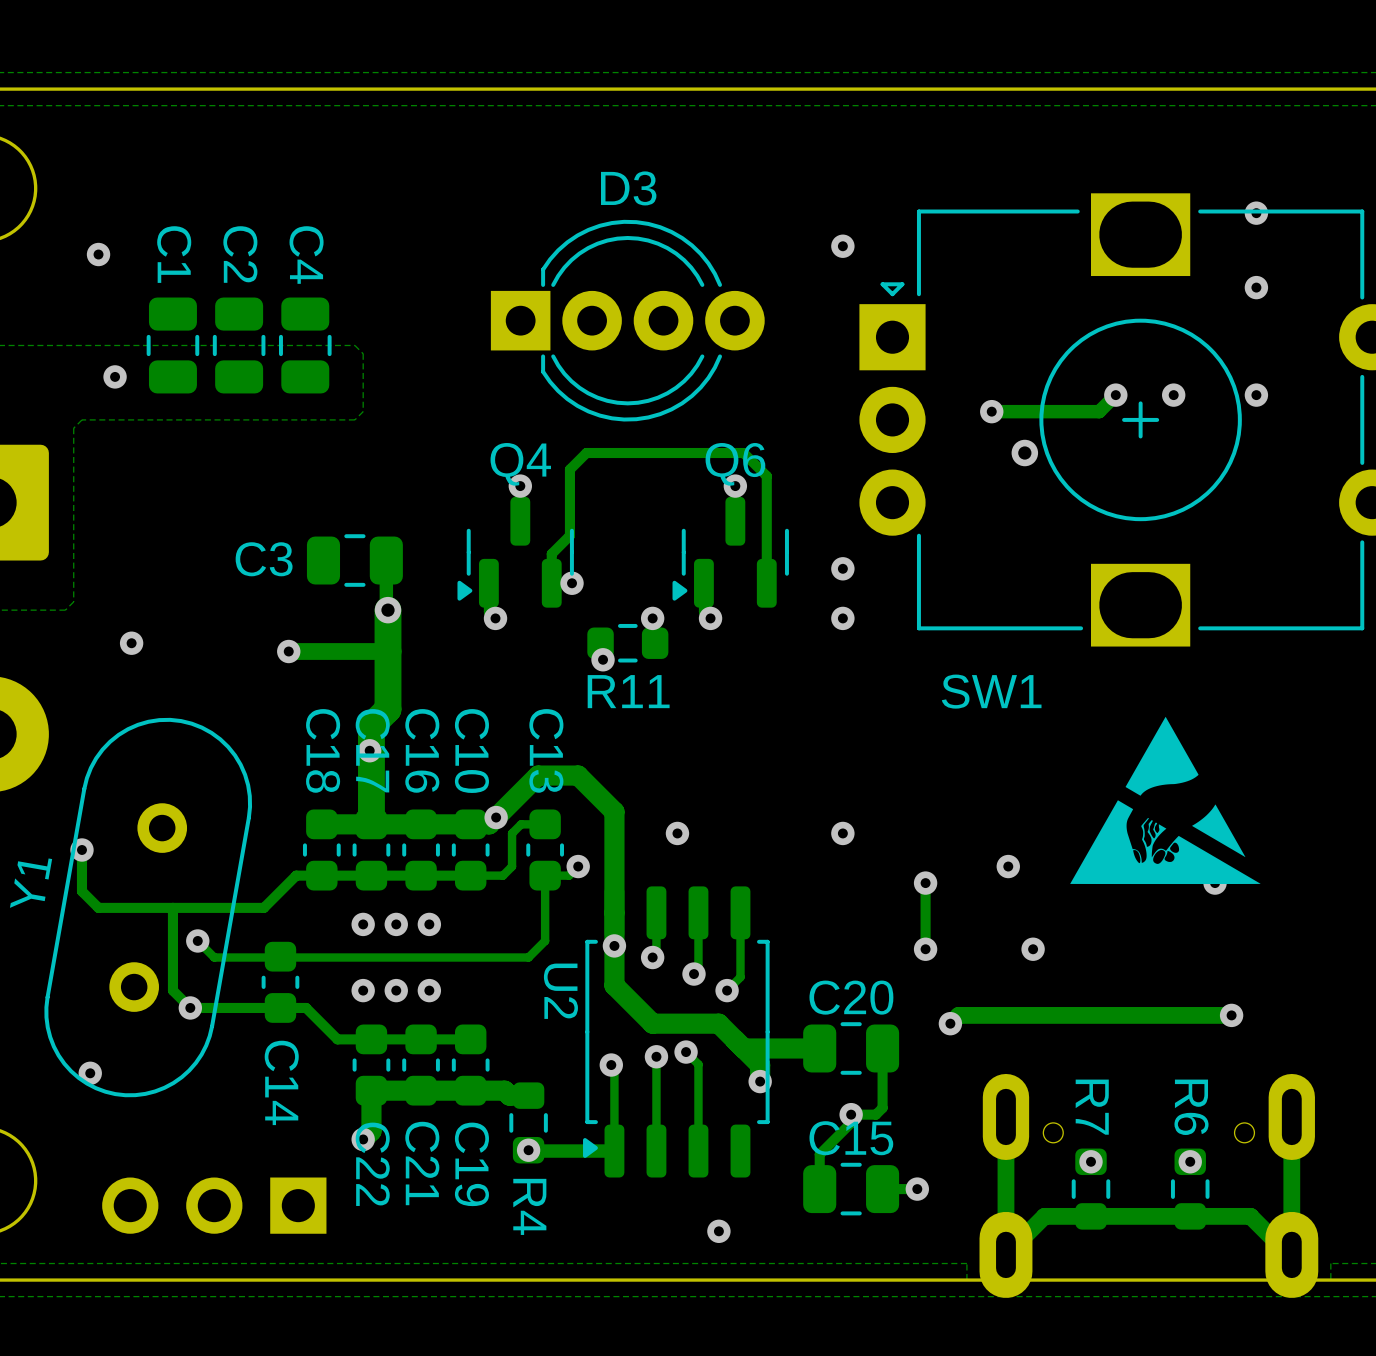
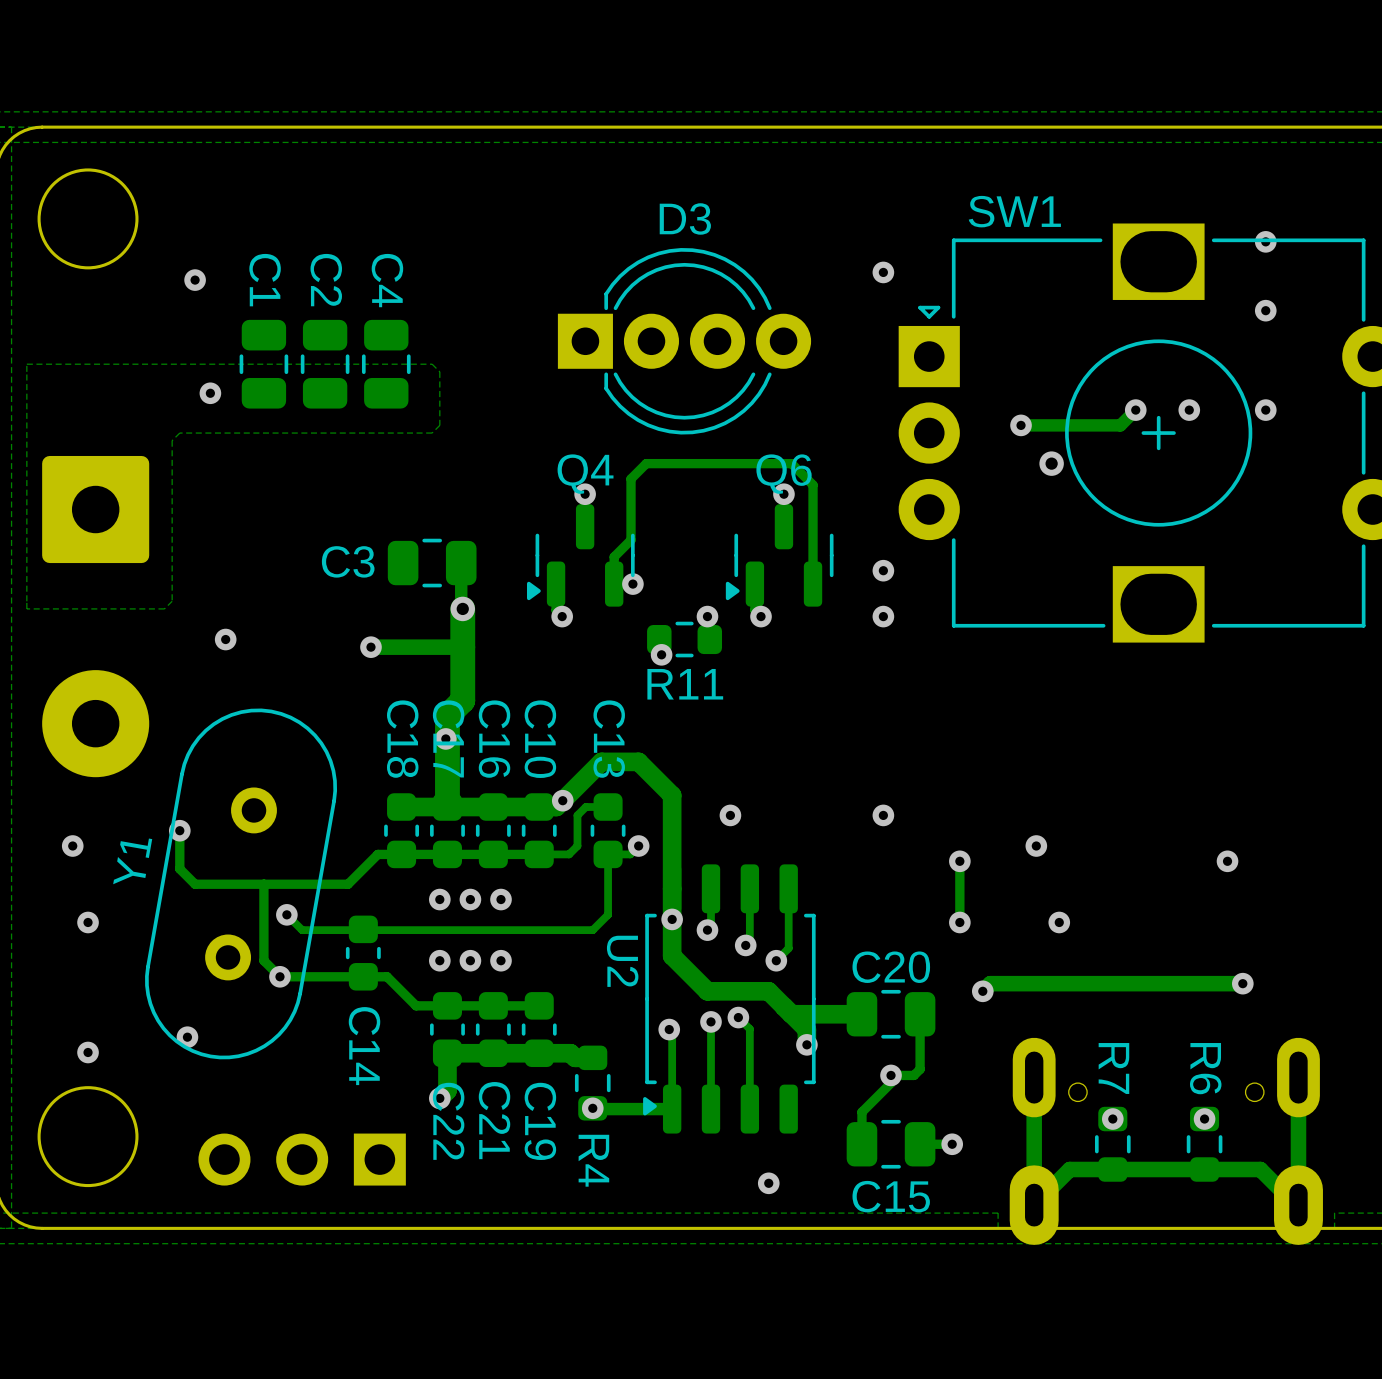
SW1 name position: SW1 (991, 691) -> SW1 (1014, 211)
drawing: [1070, 716, 1261, 885] -> none
C15 name position: C15 (851, 1138) -> C15 (891, 1196)

